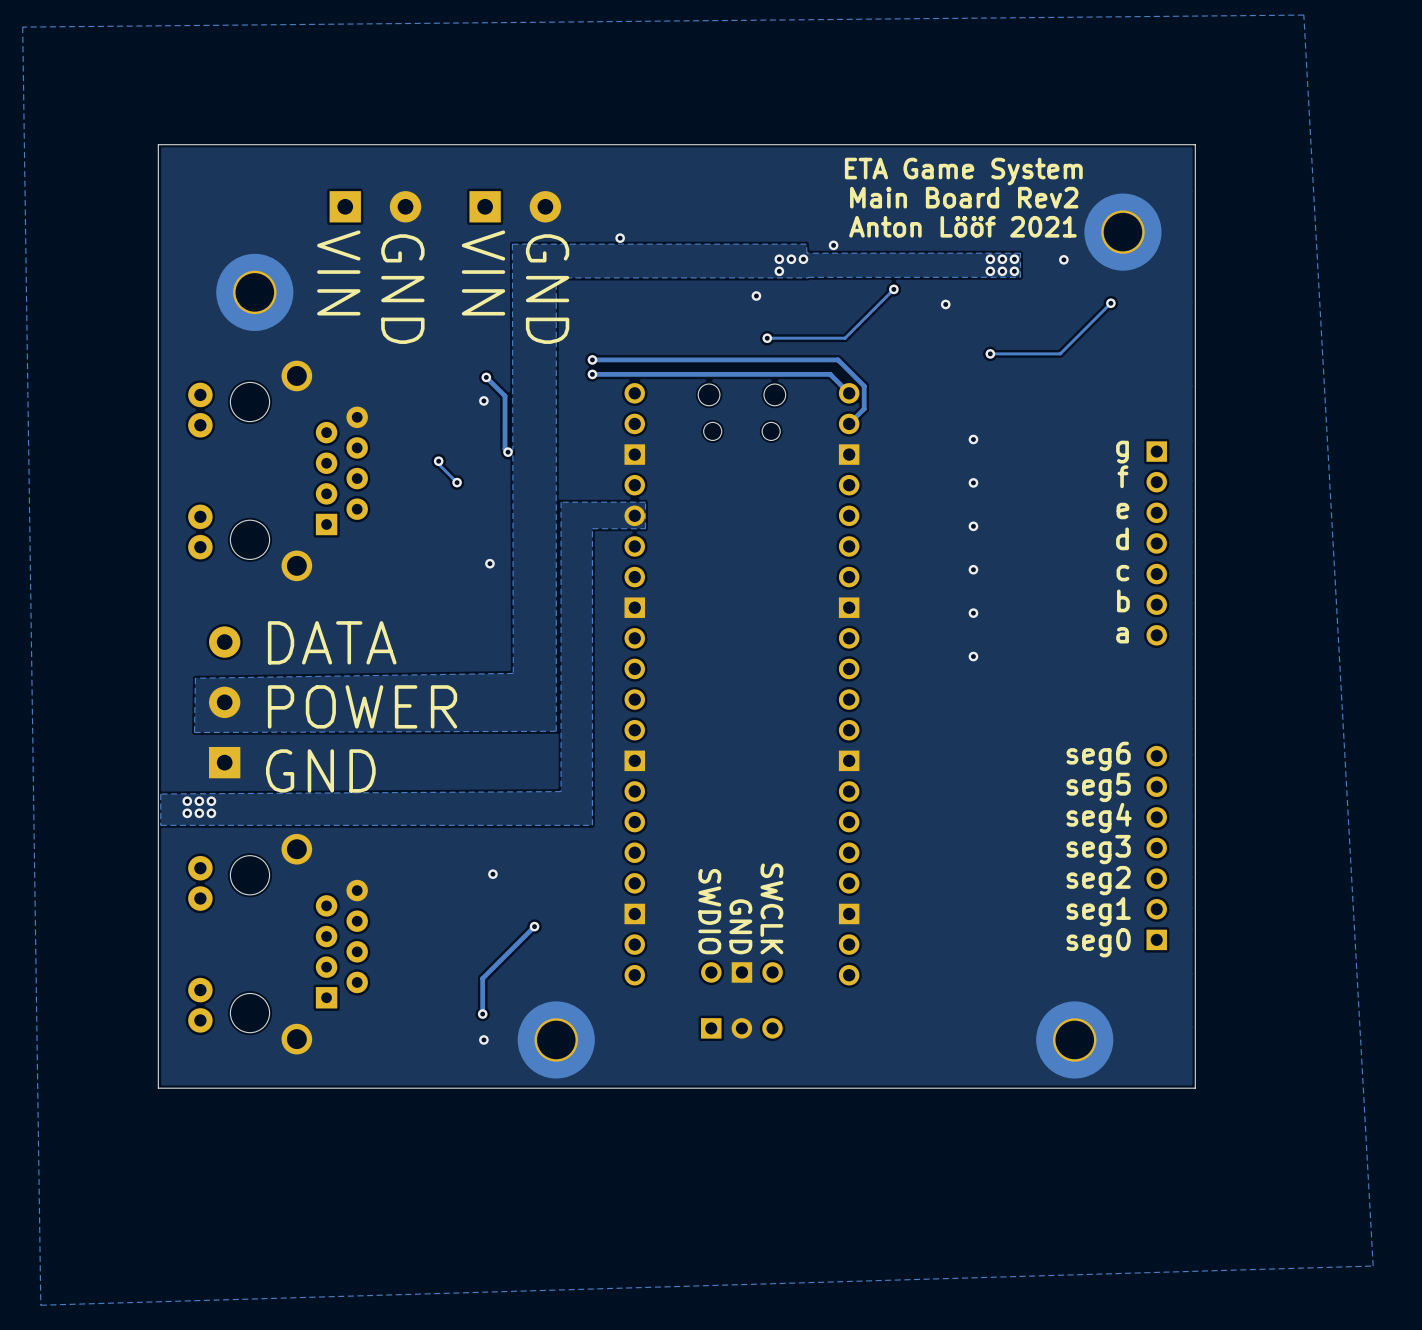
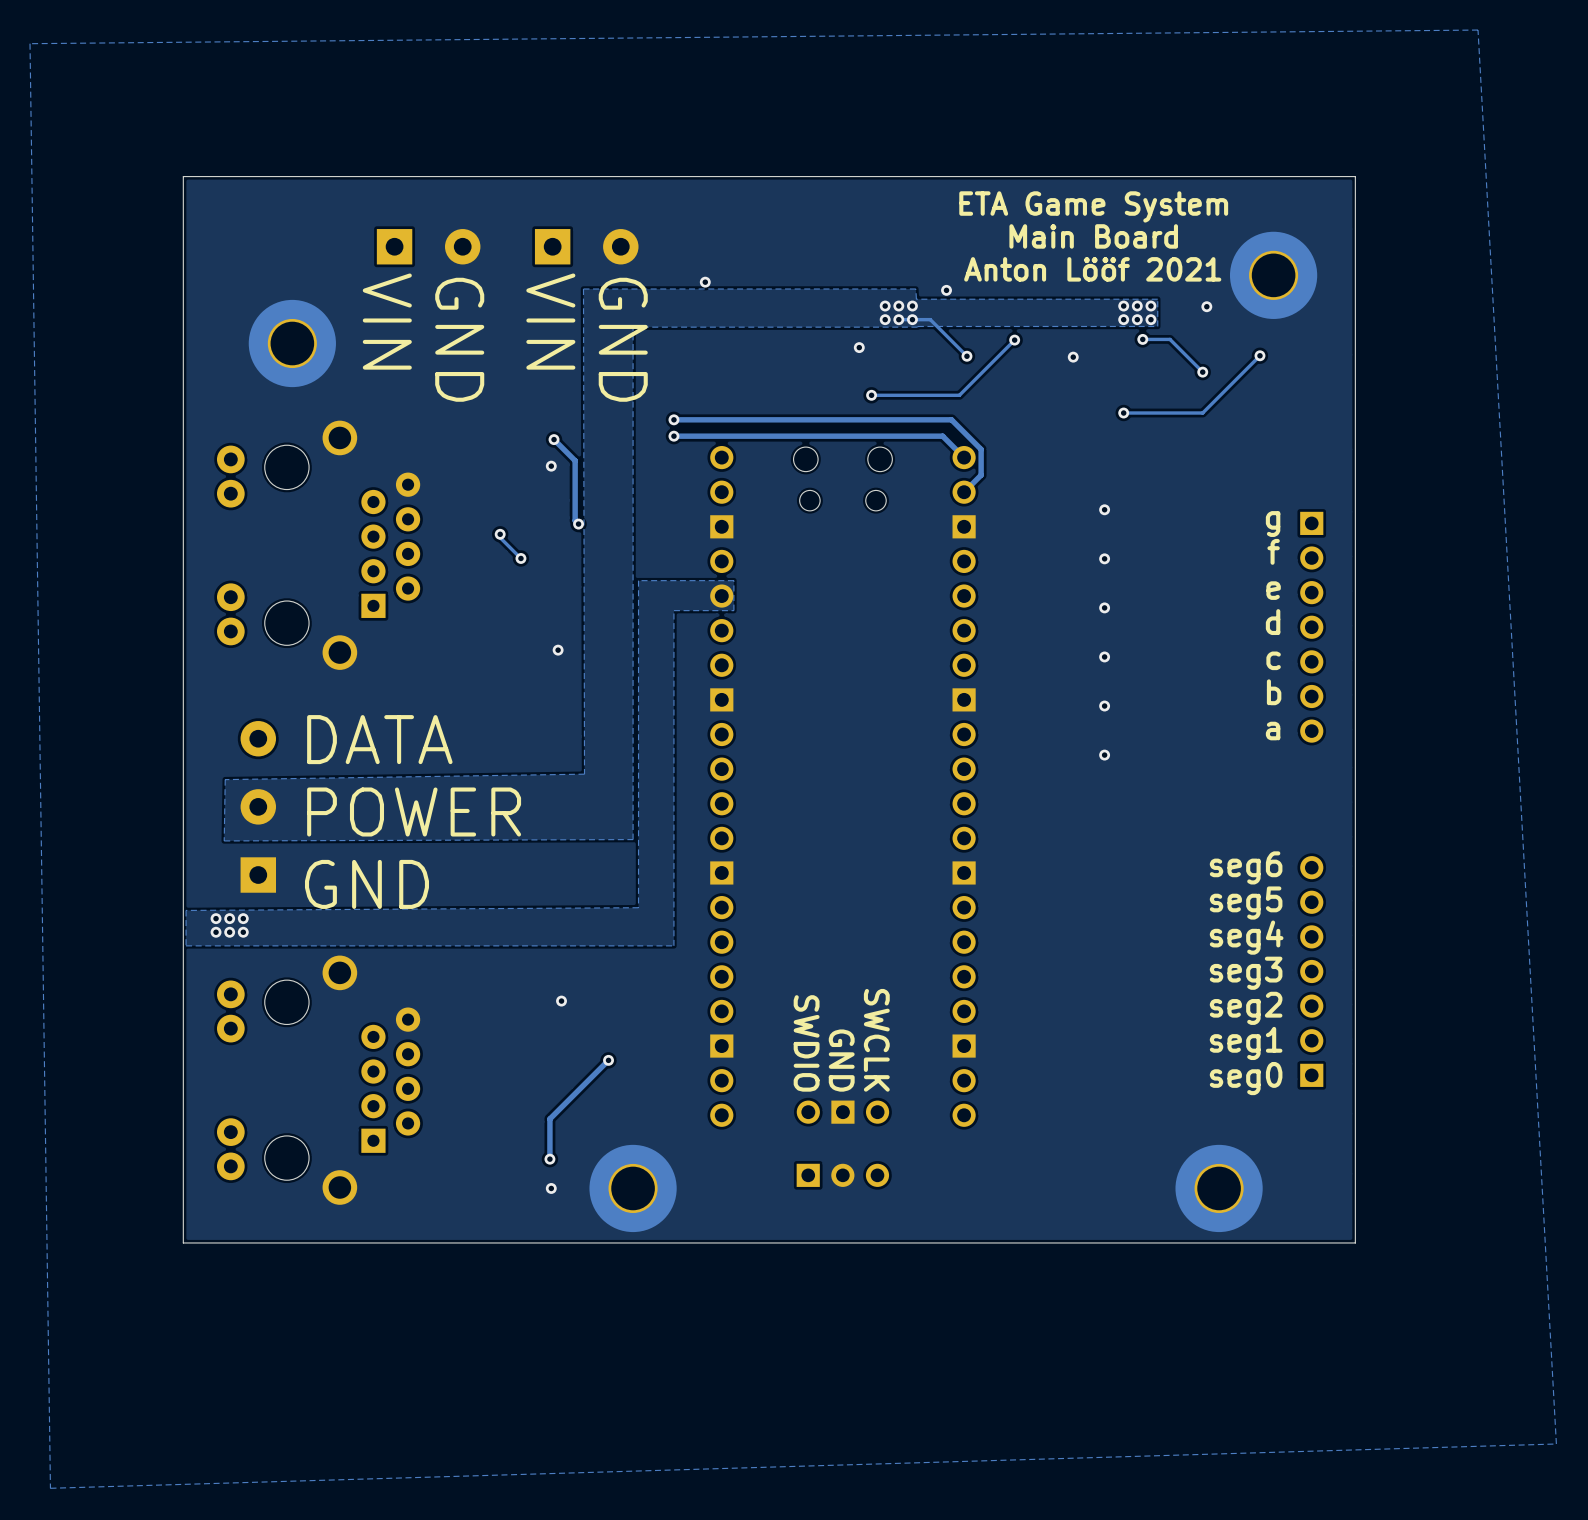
text: Main Board Rev2 (964, 197) -> Main Board (1093, 236)
track: none -> (898, 319) (930, 319) (966, 356)
via: none -> (898, 319)
via: none -> (912, 319)
track: none -> (1142, 339) (1170, 339) (1202, 372)
via: none -> (1142, 339)
via: none -> (966, 356)
via: none -> (1202, 372)

